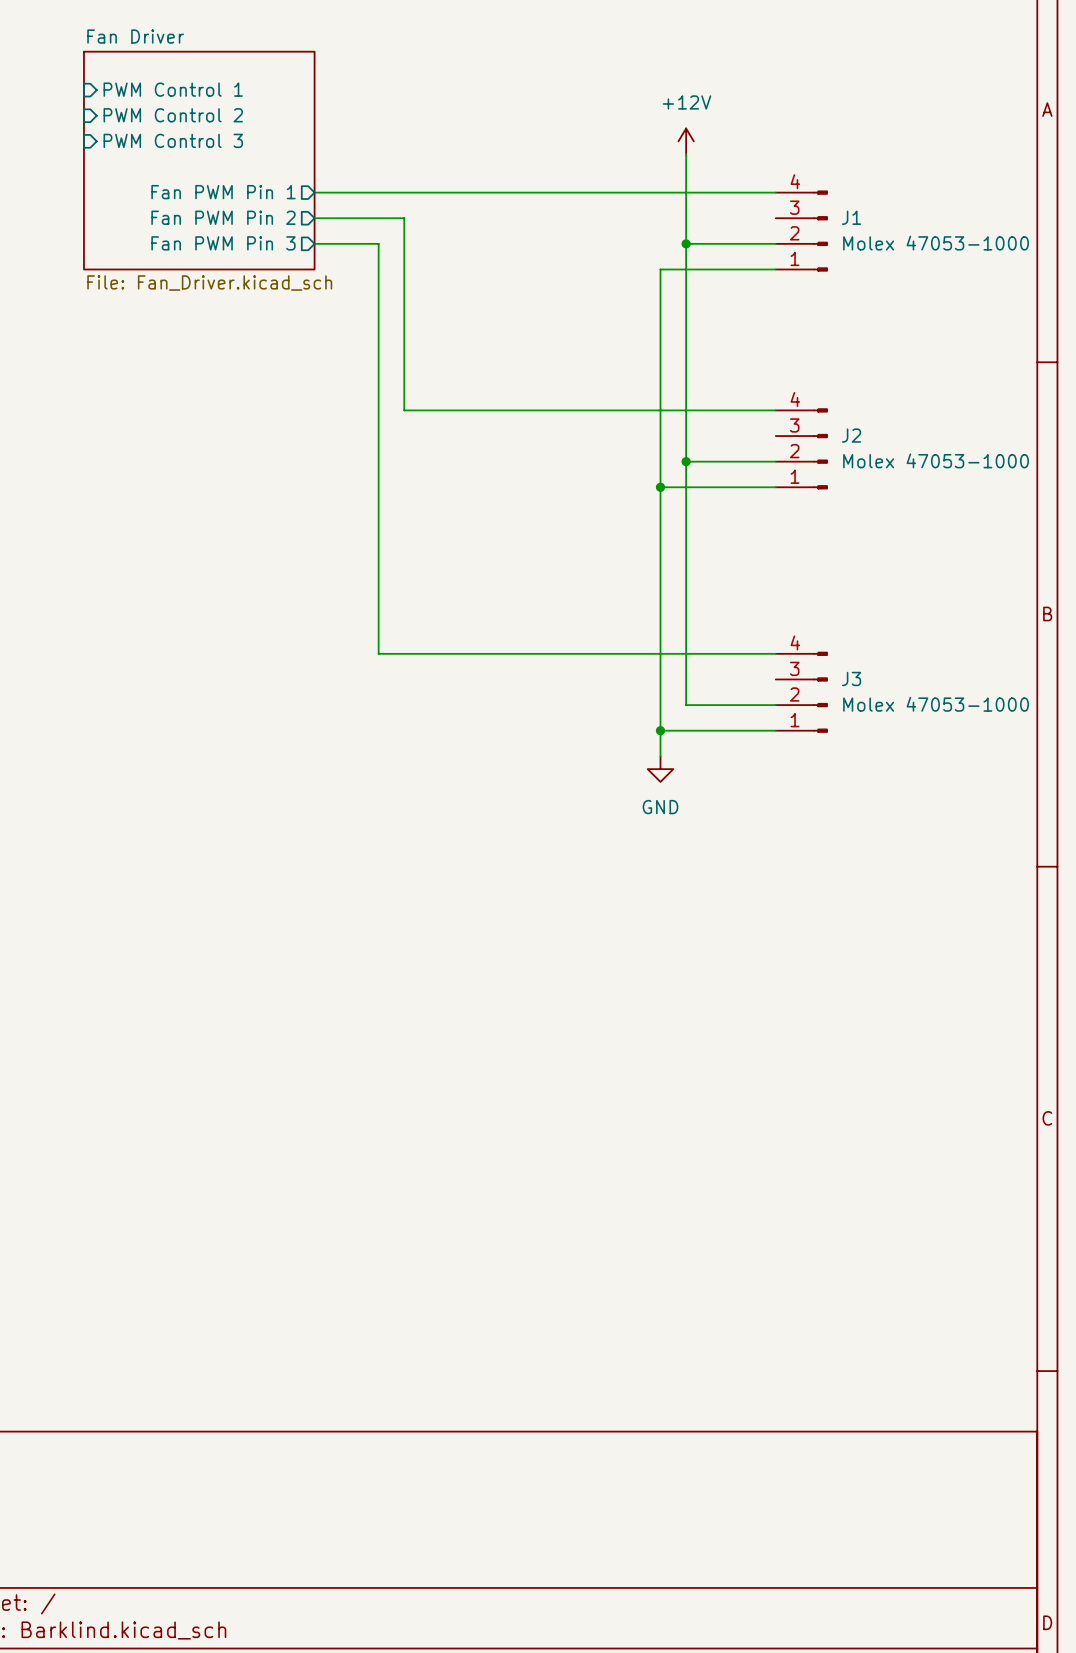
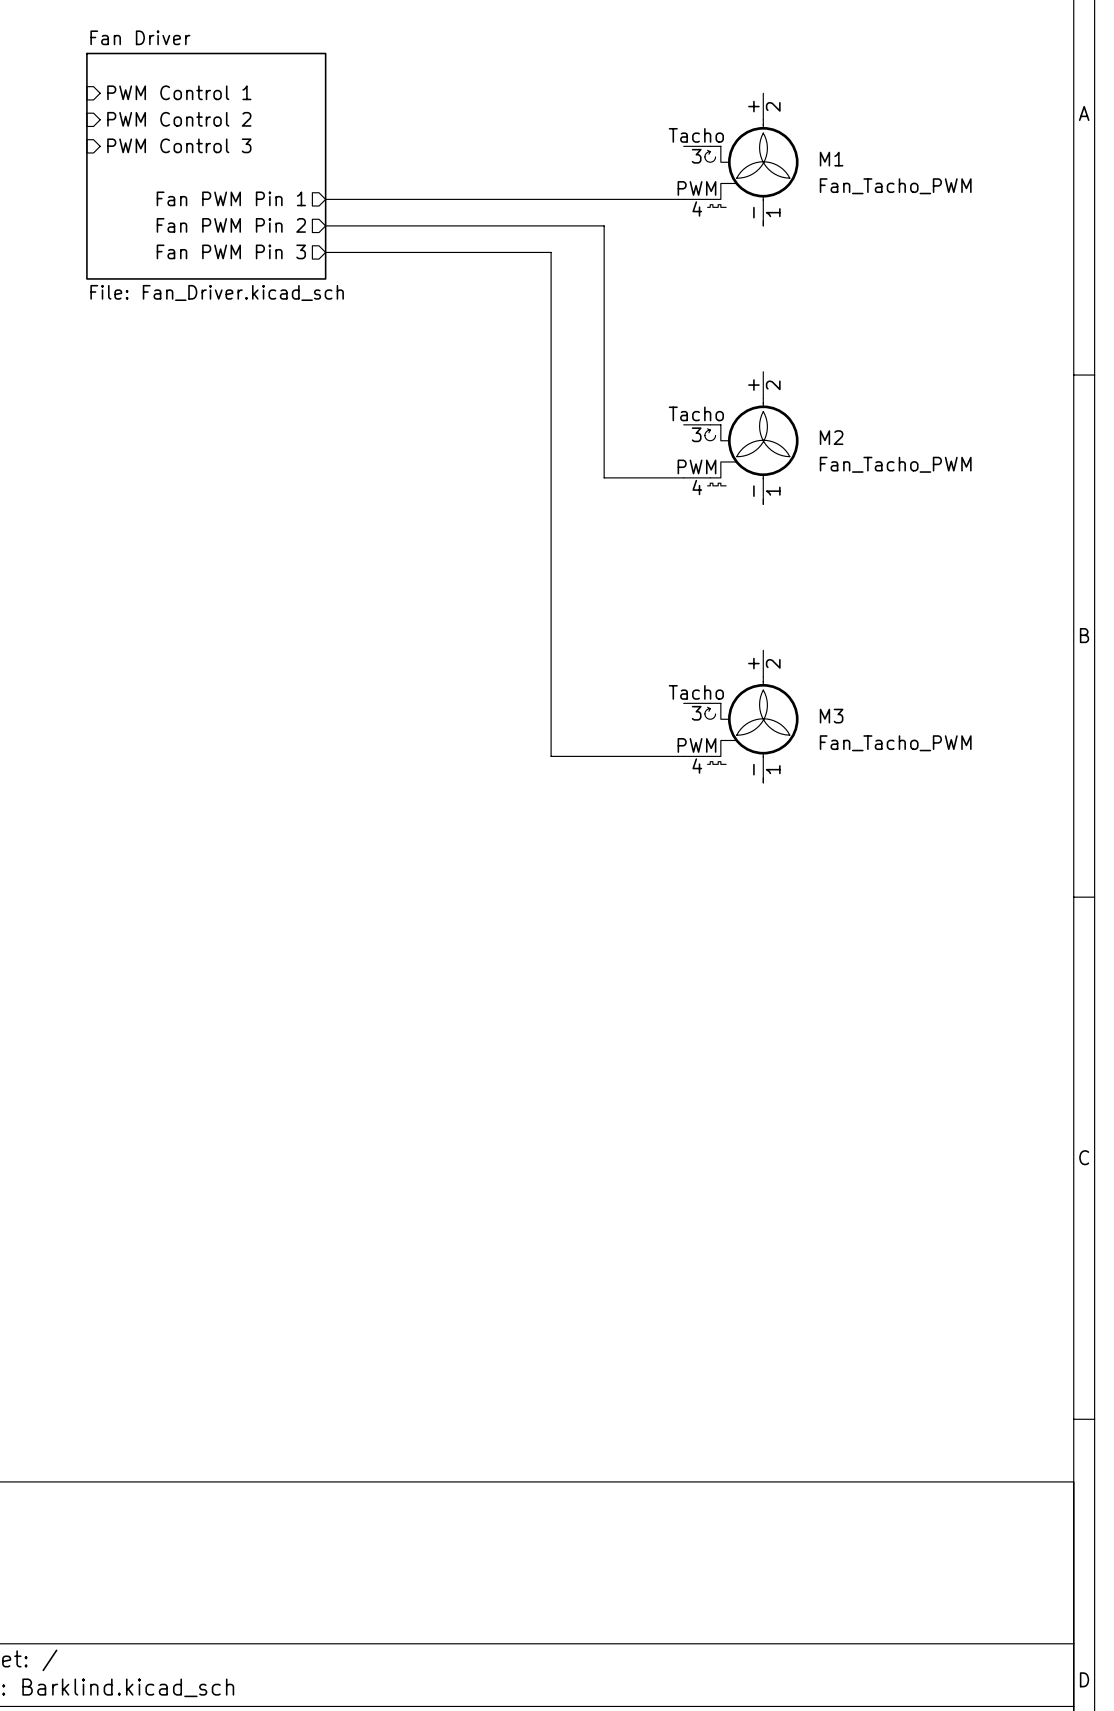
power symbol: +12V (686, 141) -> none
wire: (686, 154) (686, 705) (775, 705) -> none
M1: none -> Fan_Tacho_PWM (741, 159)
wire: (660, 192) (775, 192) -> none
wire: (404, 218) (404, 410) (775, 410) -> (418, 225) (604, 225) (604, 477) (683, 477)
J1: Molex 47053-1000 (801, 231) -> none
wire: (378, 243) (378, 653) (775, 653) -> (391, 252) (551, 252) (551, 756) (683, 756)
wire: (686, 243) (775, 243) -> none
junction: (686, 243) -> none
wire: (775, 269) (660, 269) (660, 756) -> none
M2: none -> Fan_Tacho_PWM (741, 438)
J2: Molex 47053-1000 (801, 448) -> none
wire: (686, 461) (775, 461) -> none
junction: (686, 461) -> none
wire: (660, 487) (775, 487) -> none
junction: (660, 487) -> none
M3: none -> Fan_Tacho_PWM (741, 716)
J3: Molex 47053-1000 (801, 692) -> none
wire: (660, 730) (775, 730) -> none
junction: (660, 730) -> none
power symbol: GND (660, 769) -> none

